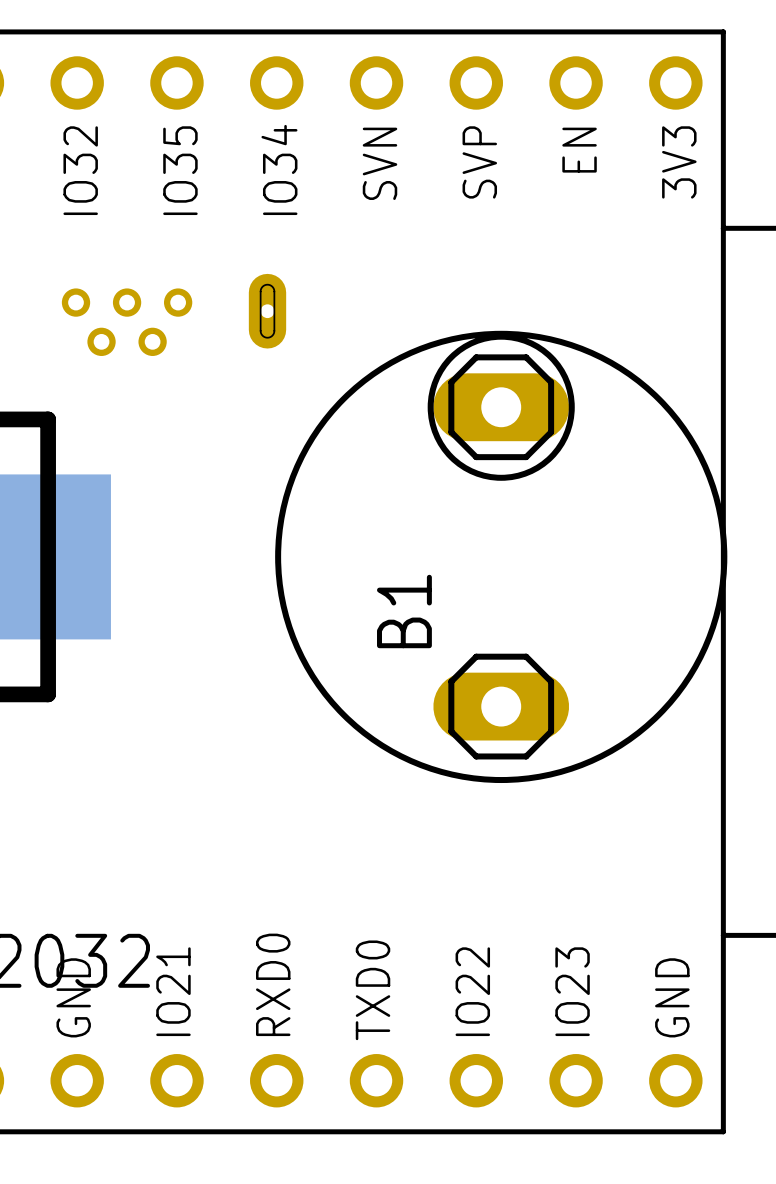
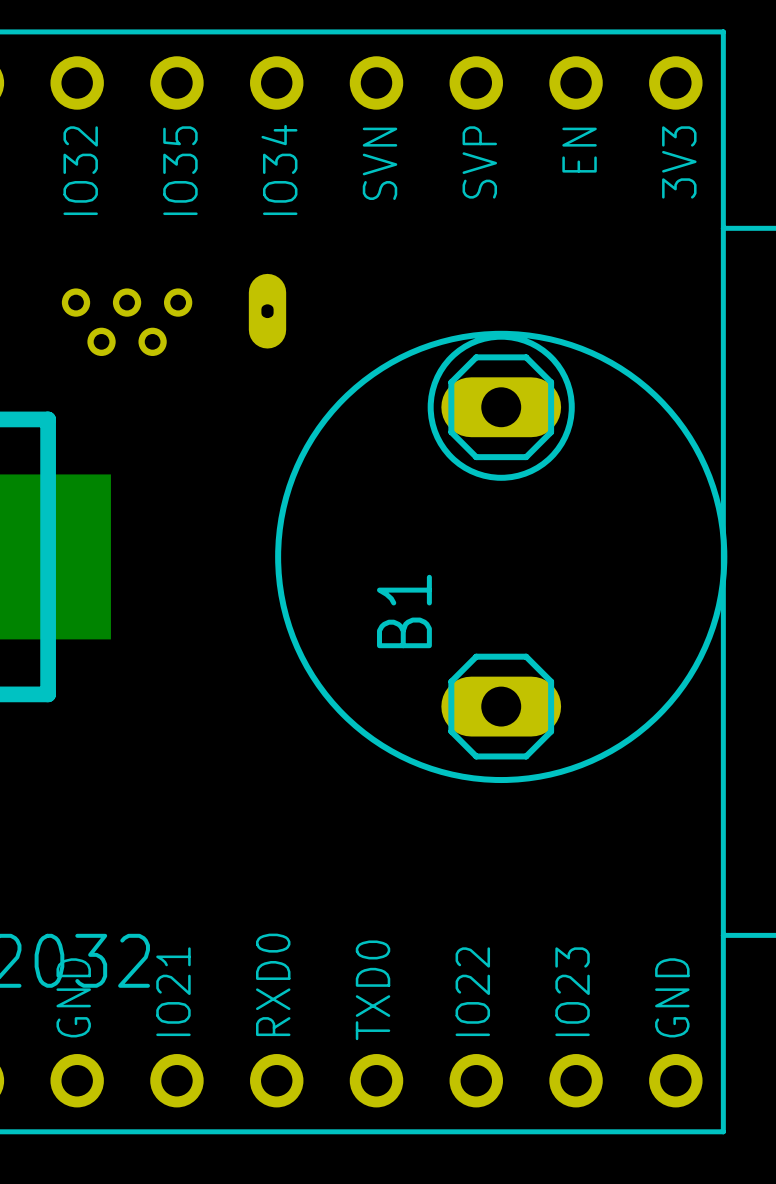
B1 footprint: [275, 330, 728, 784] -> [275, 330, 728, 784]

